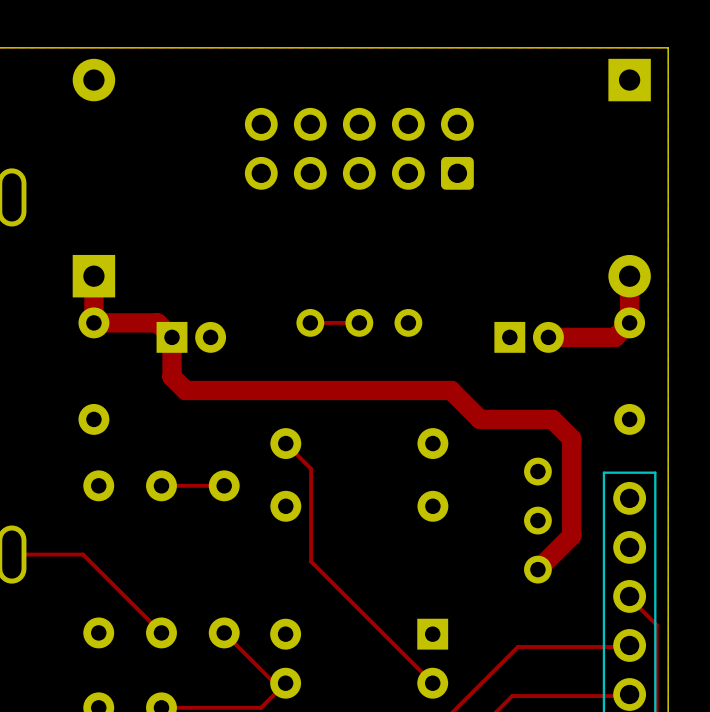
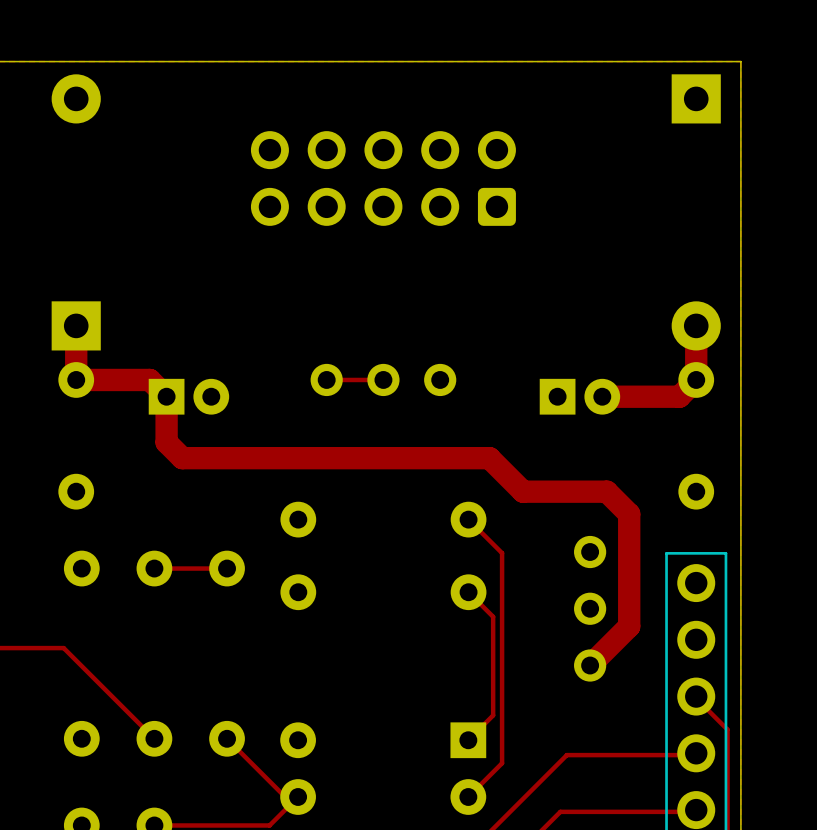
track: (285, 443) (311, 468) (311, 561) (432, 683) -> (468, 519) (502, 553) (502, 763) (468, 797)
track: none -> (468, 592) (493, 616) (493, 715) (468, 740)

